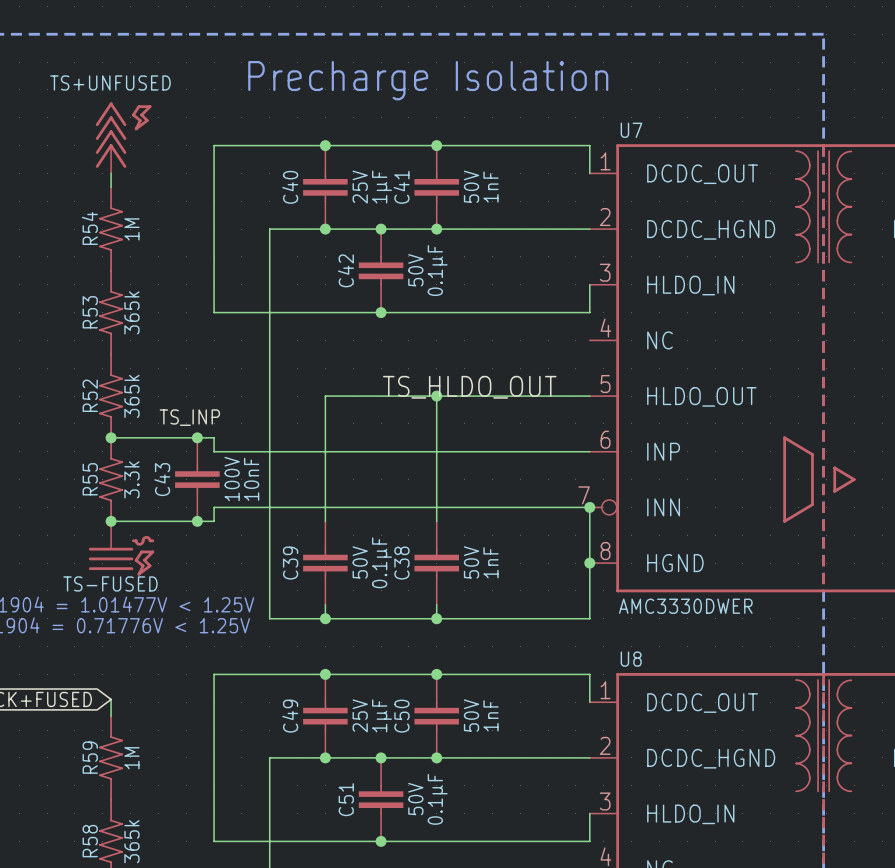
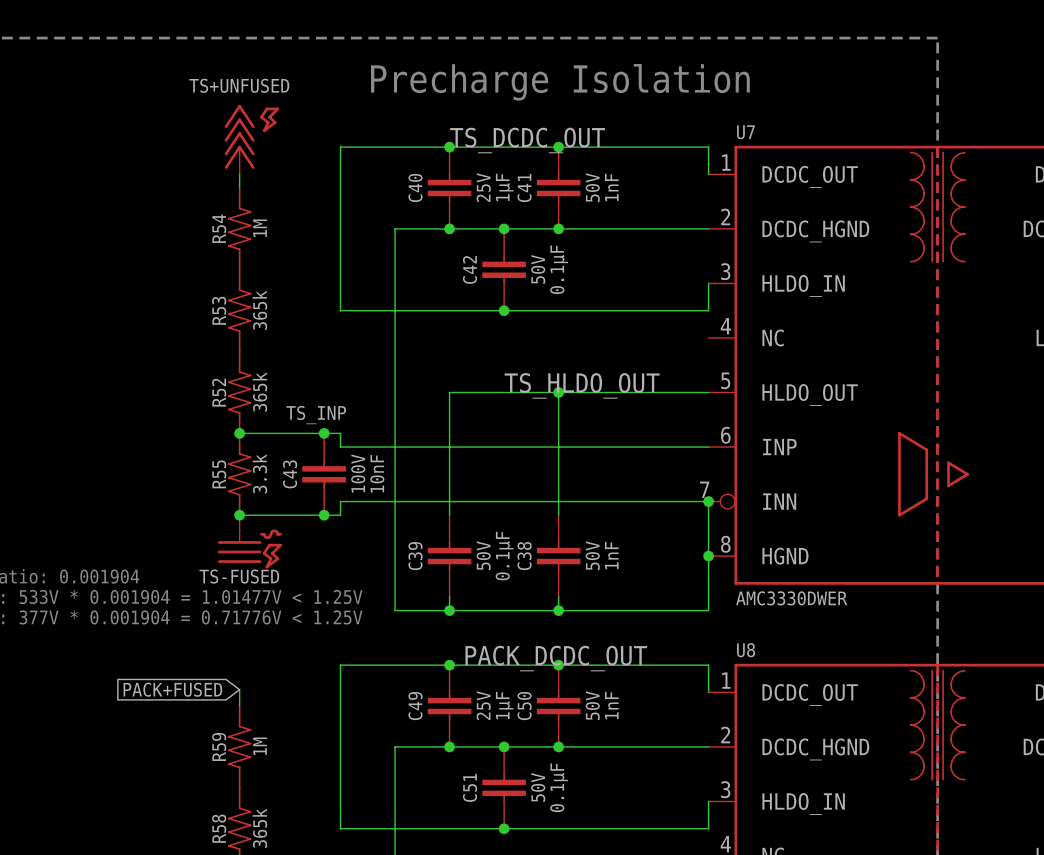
label: none -> TS_DCDC_OUT (527, 140)
label: none -> PACK_DCDC_OUT (556, 658)

